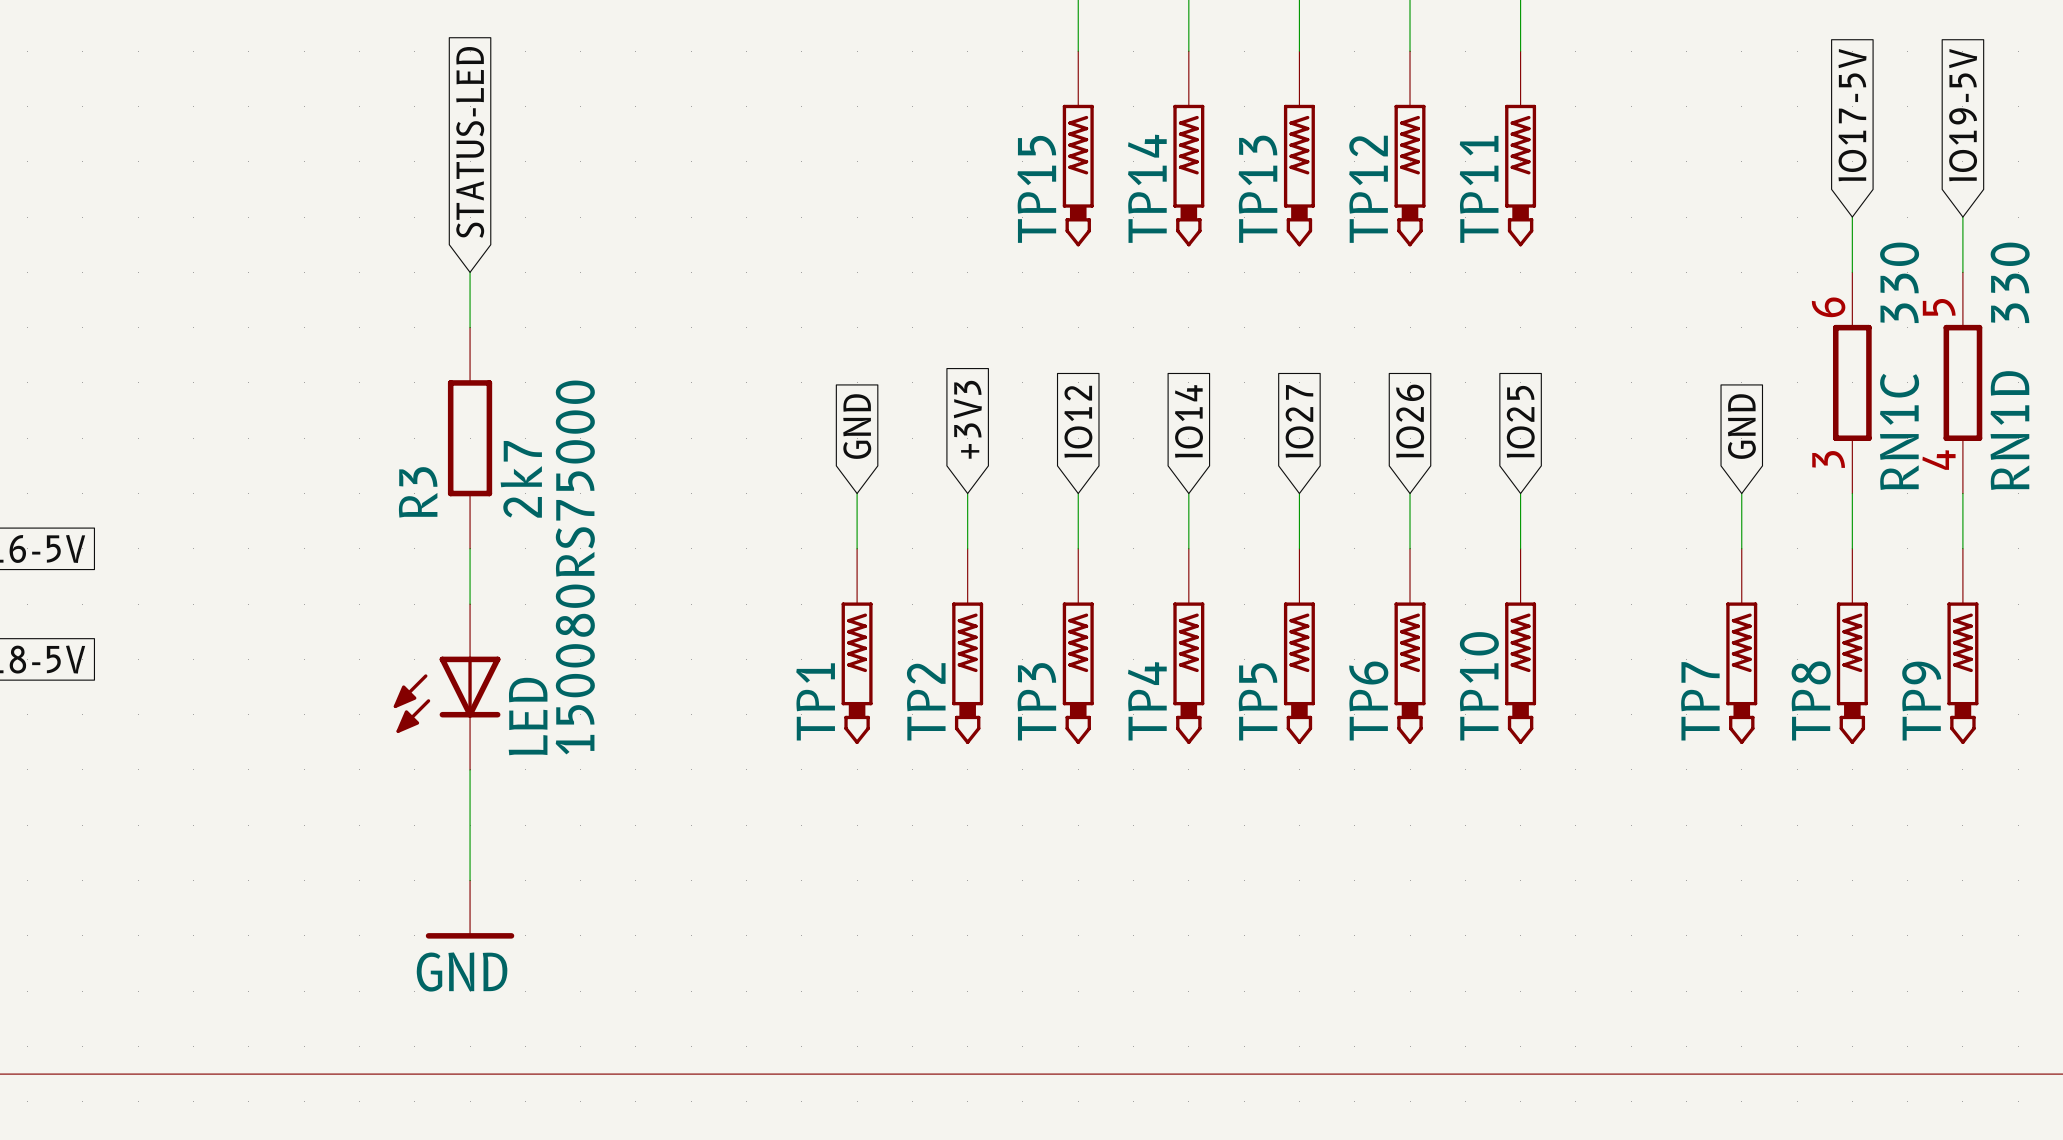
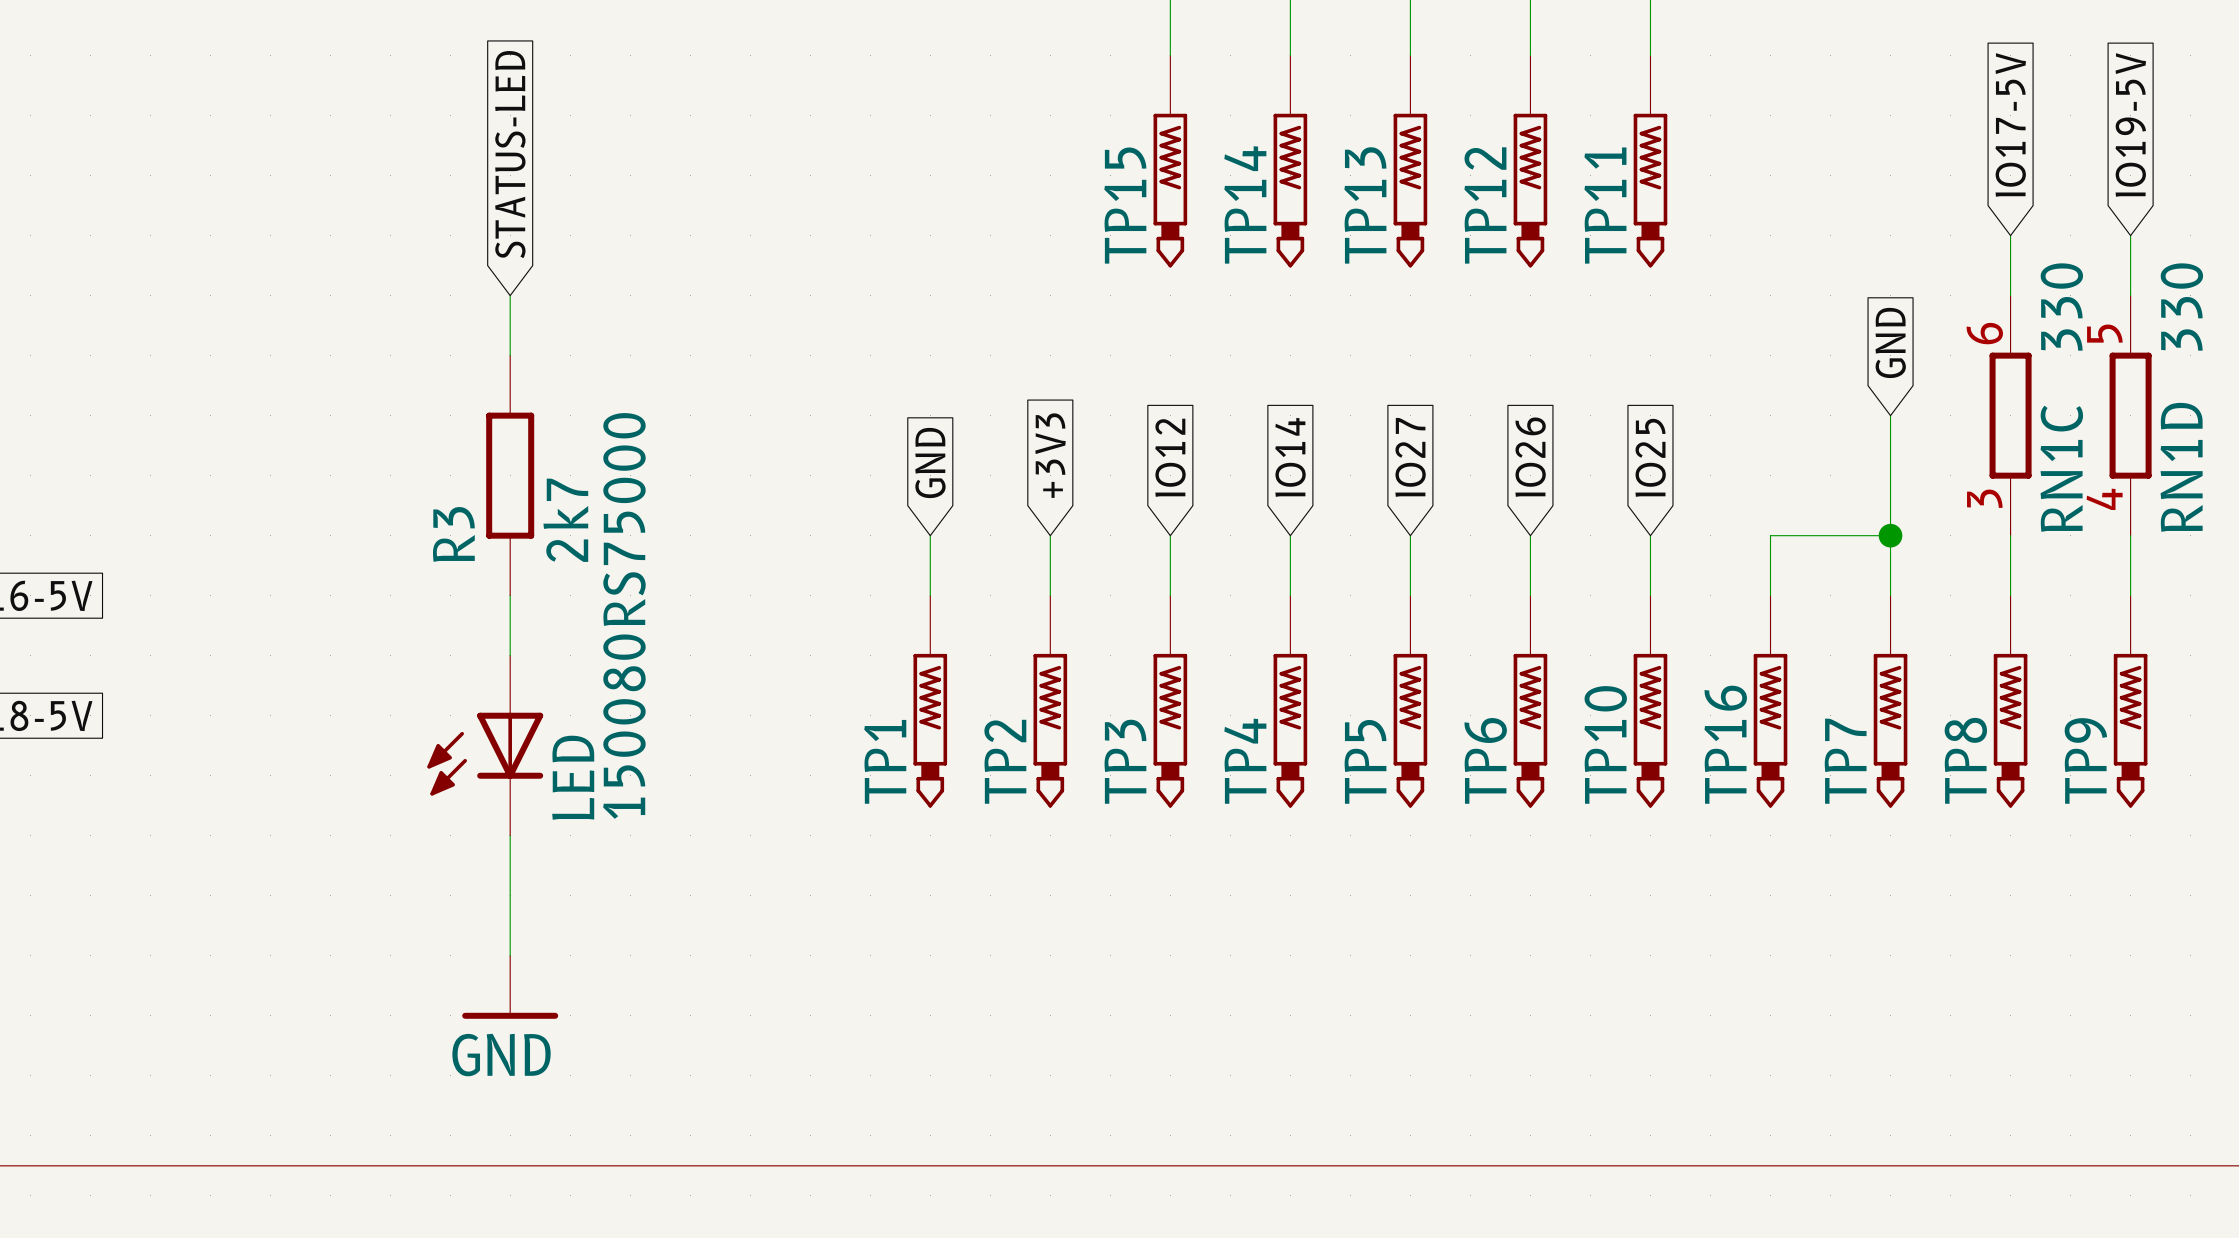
wire: none -> (1890, 415) (1890, 535) (1770, 535) (1770, 595)
global label position: GND (1741, 426) -> GND (1890, 342)
junction: none -> (1890, 535)
TP16: none -> (1770, 701)

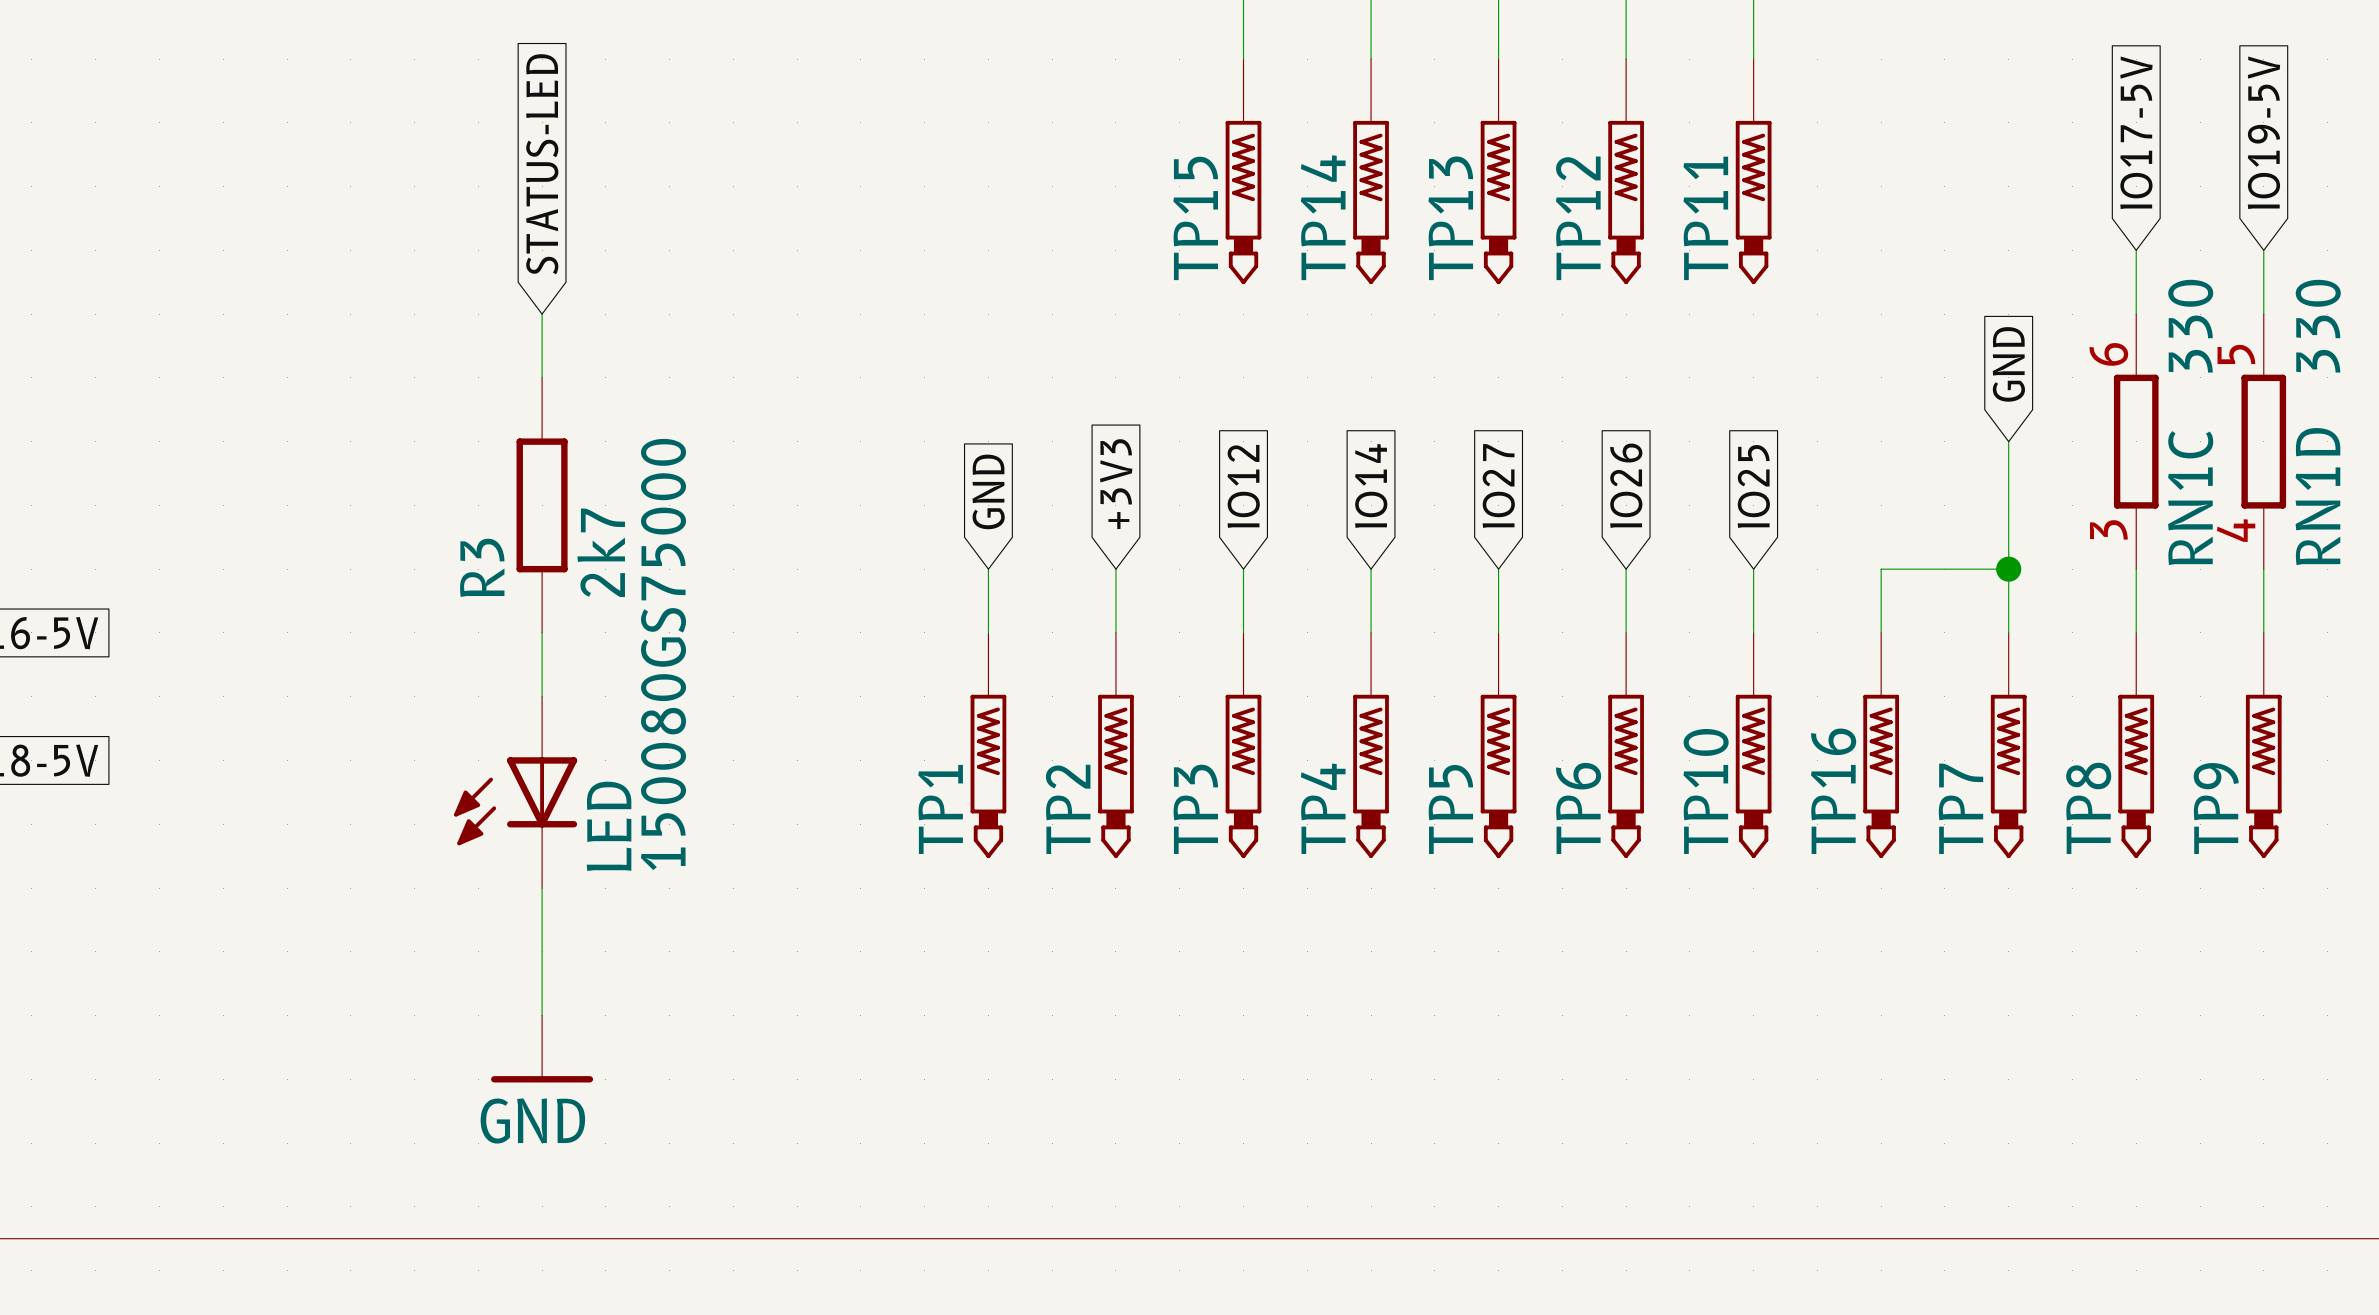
LED value: 150080RS75000 (624, 615) -> 150080GS75000 (663, 654)

